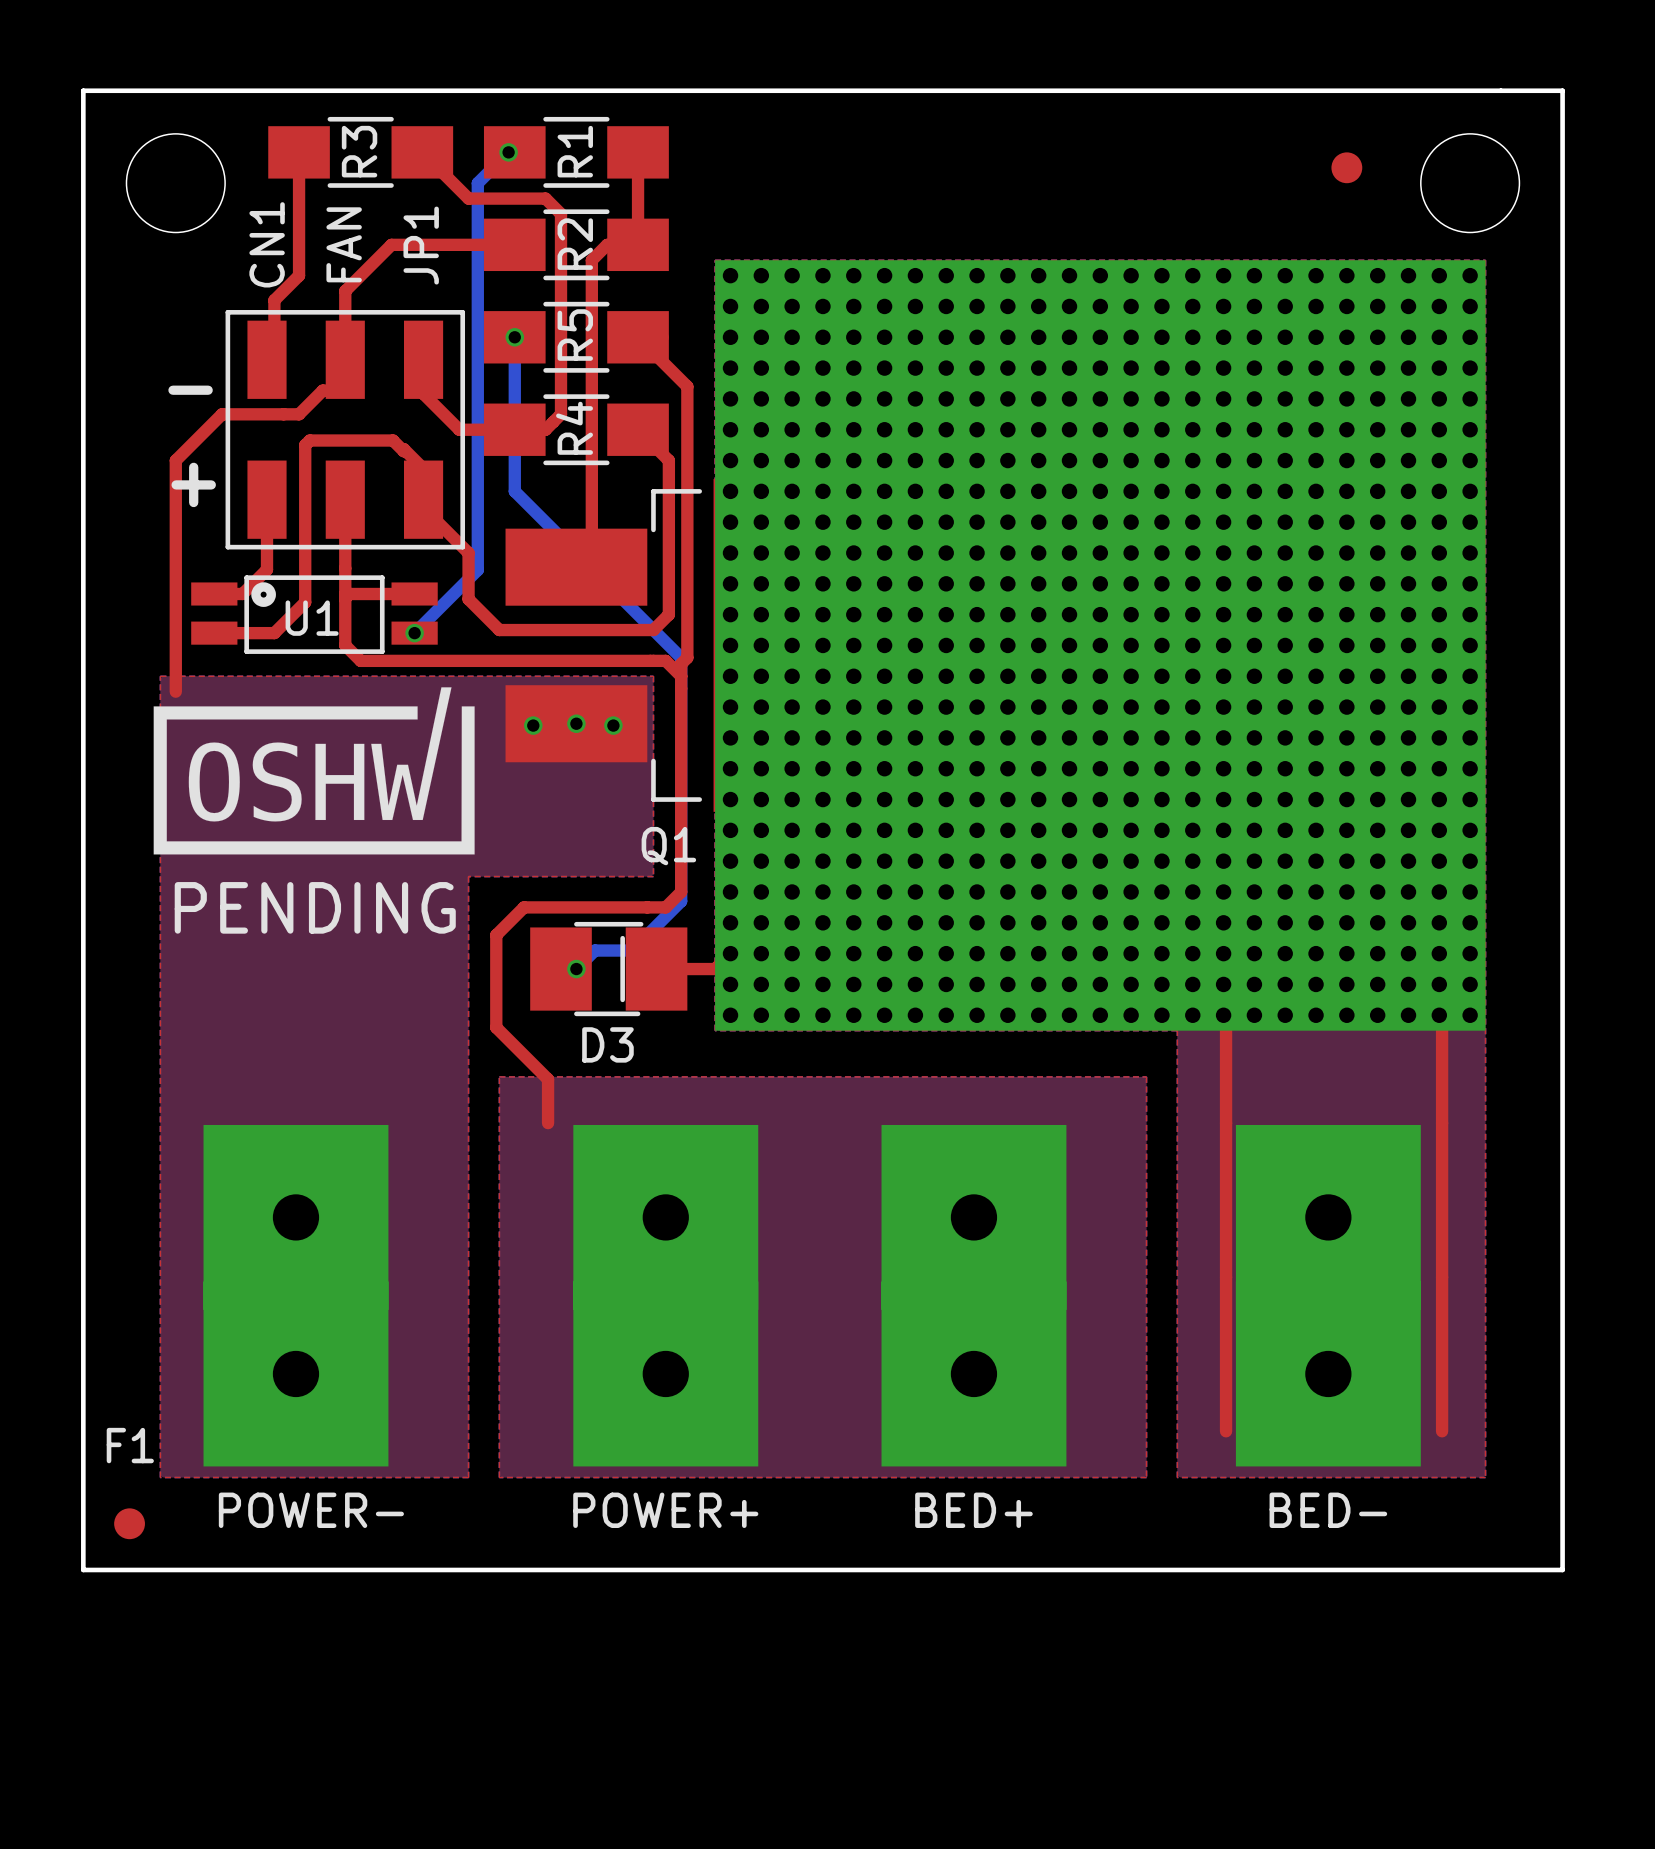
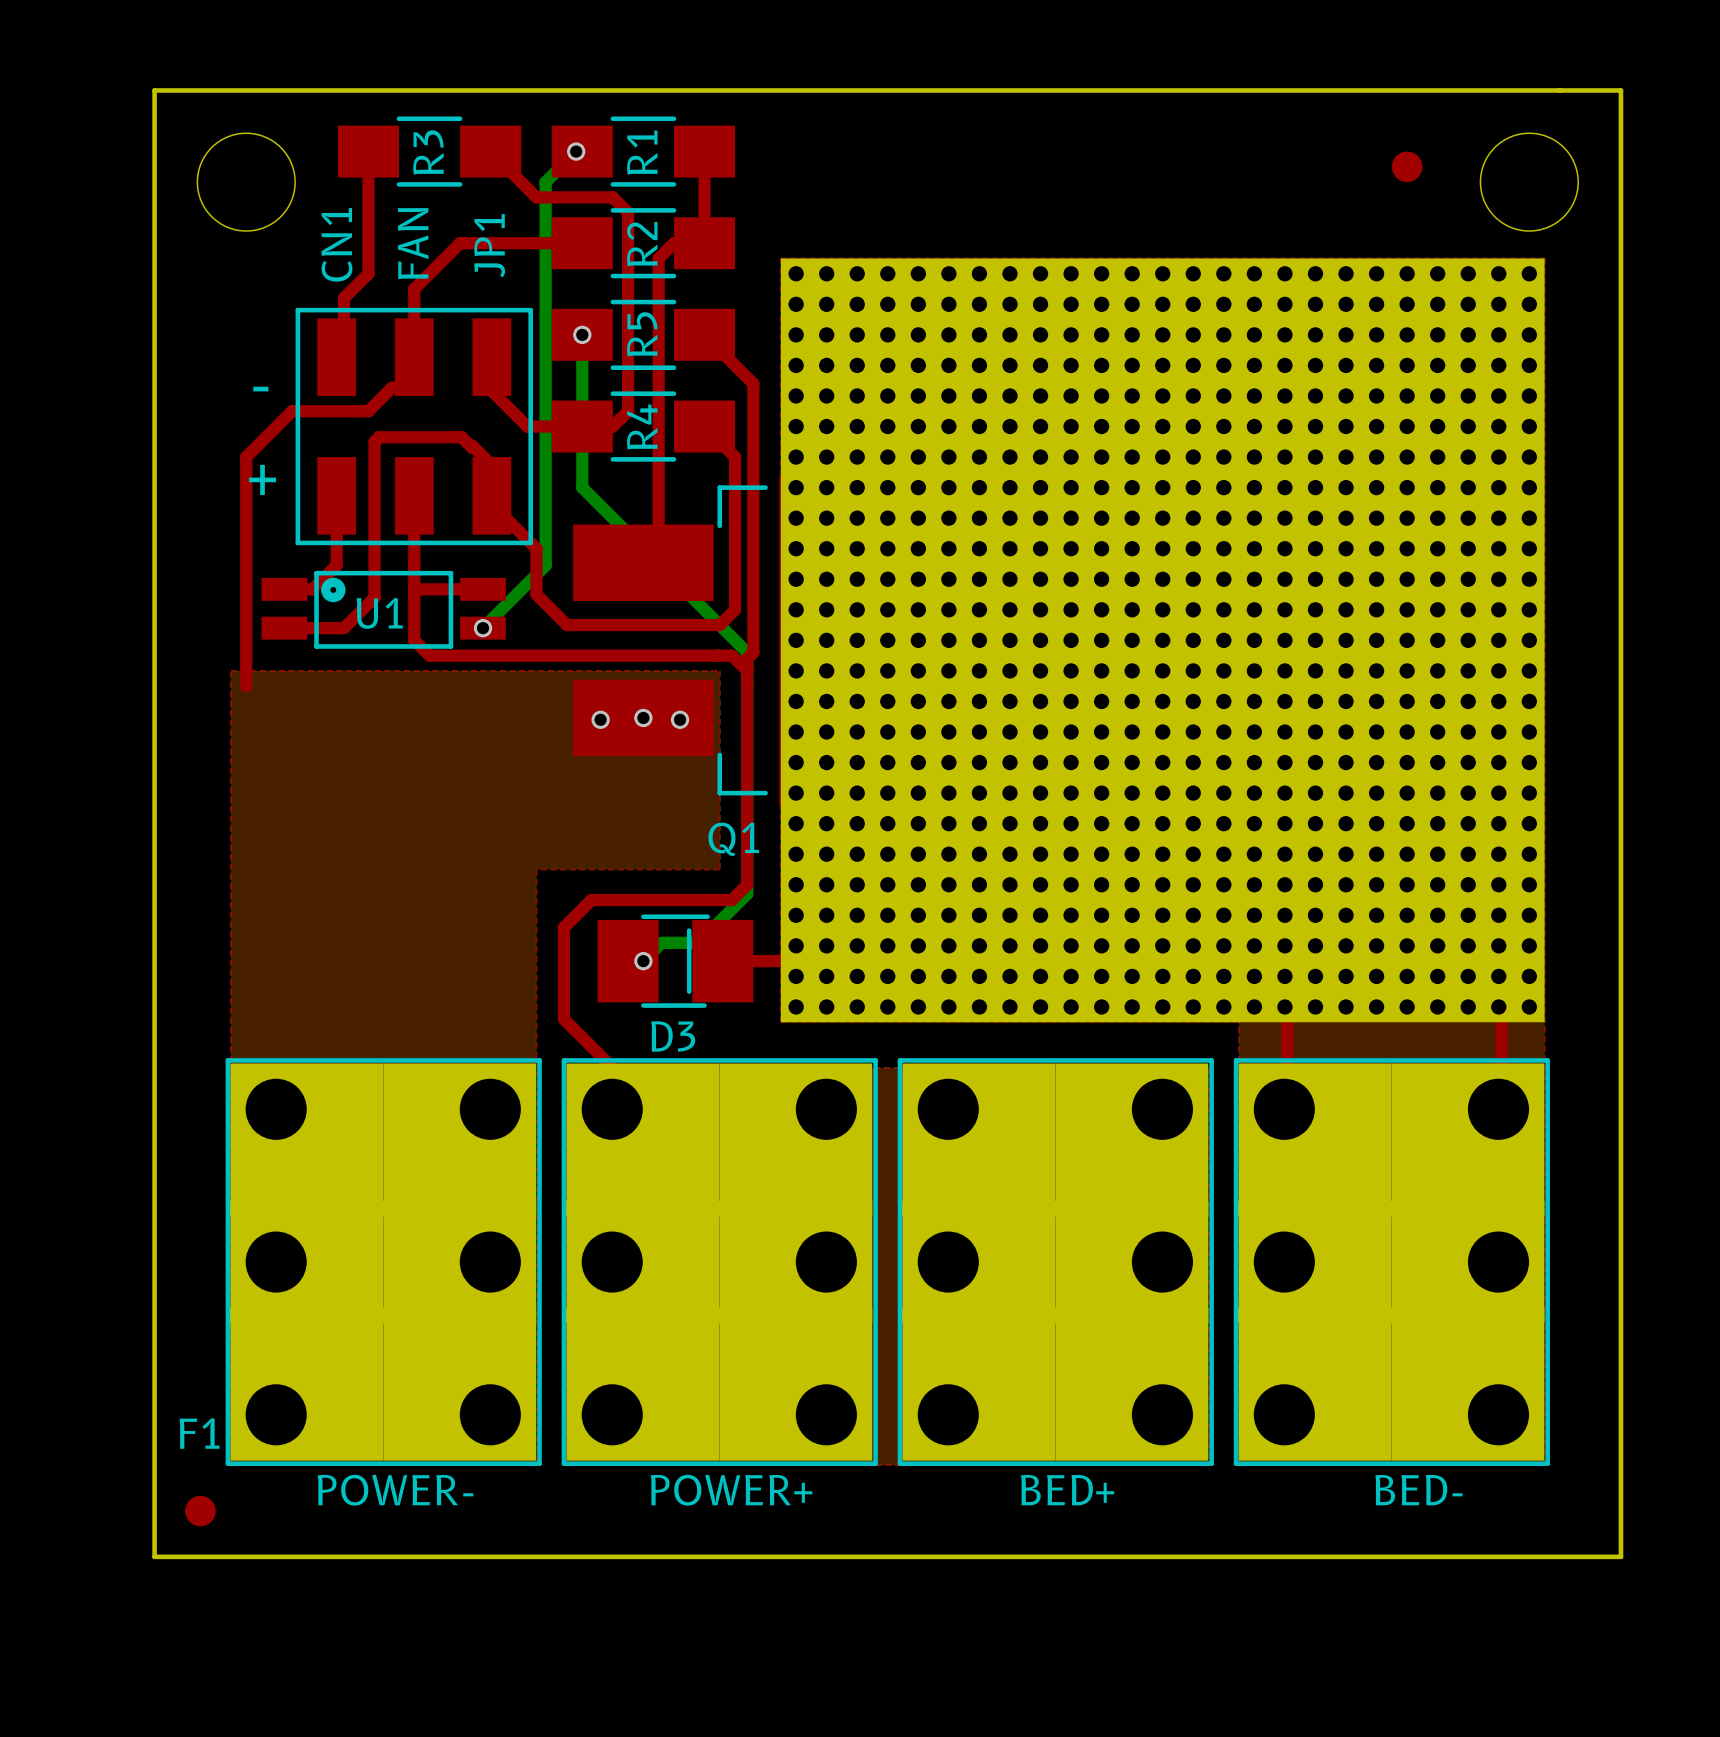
drawing: [153, 687, 475, 855] -> none
POWER- footprint: [203, 1124, 389, 1467] -> [225, 1058, 542, 1466]
POWER+ footprint: [573, 1124, 759, 1467] -> [561, 1058, 878, 1466]
BED+ footprint: [881, 1124, 1067, 1467] -> [897, 1058, 1214, 1466]
BED- footprint: [1235, 1124, 1421, 1467] -> [1233, 1058, 1550, 1466]

